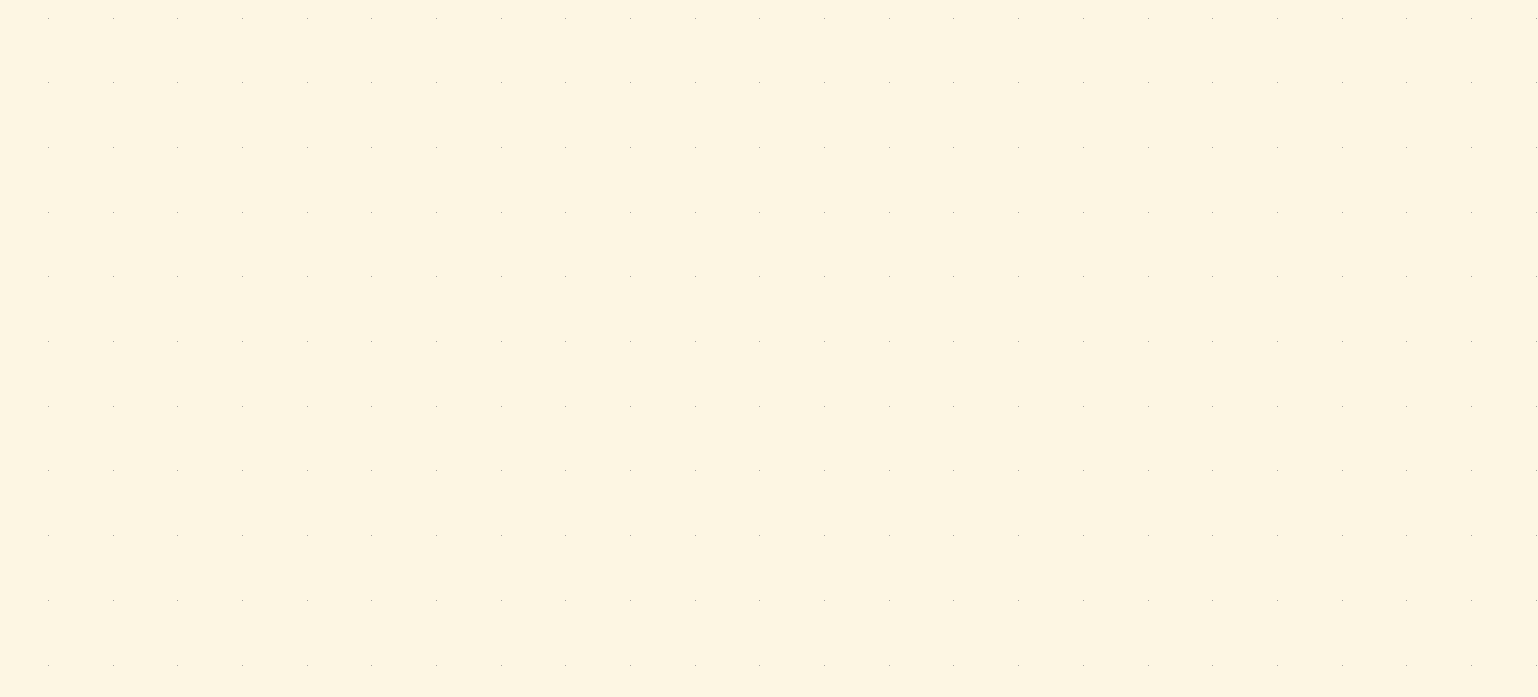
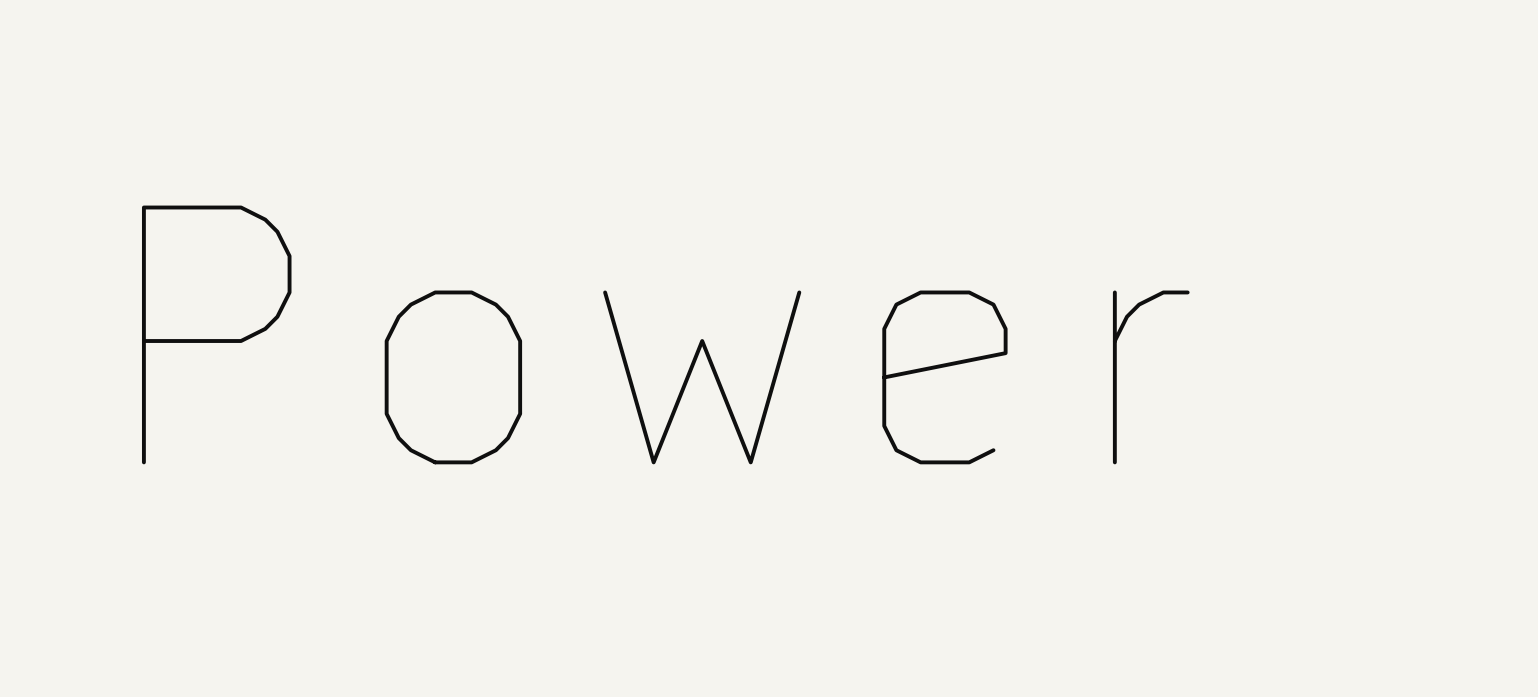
label: none -> Power (665, 334)

